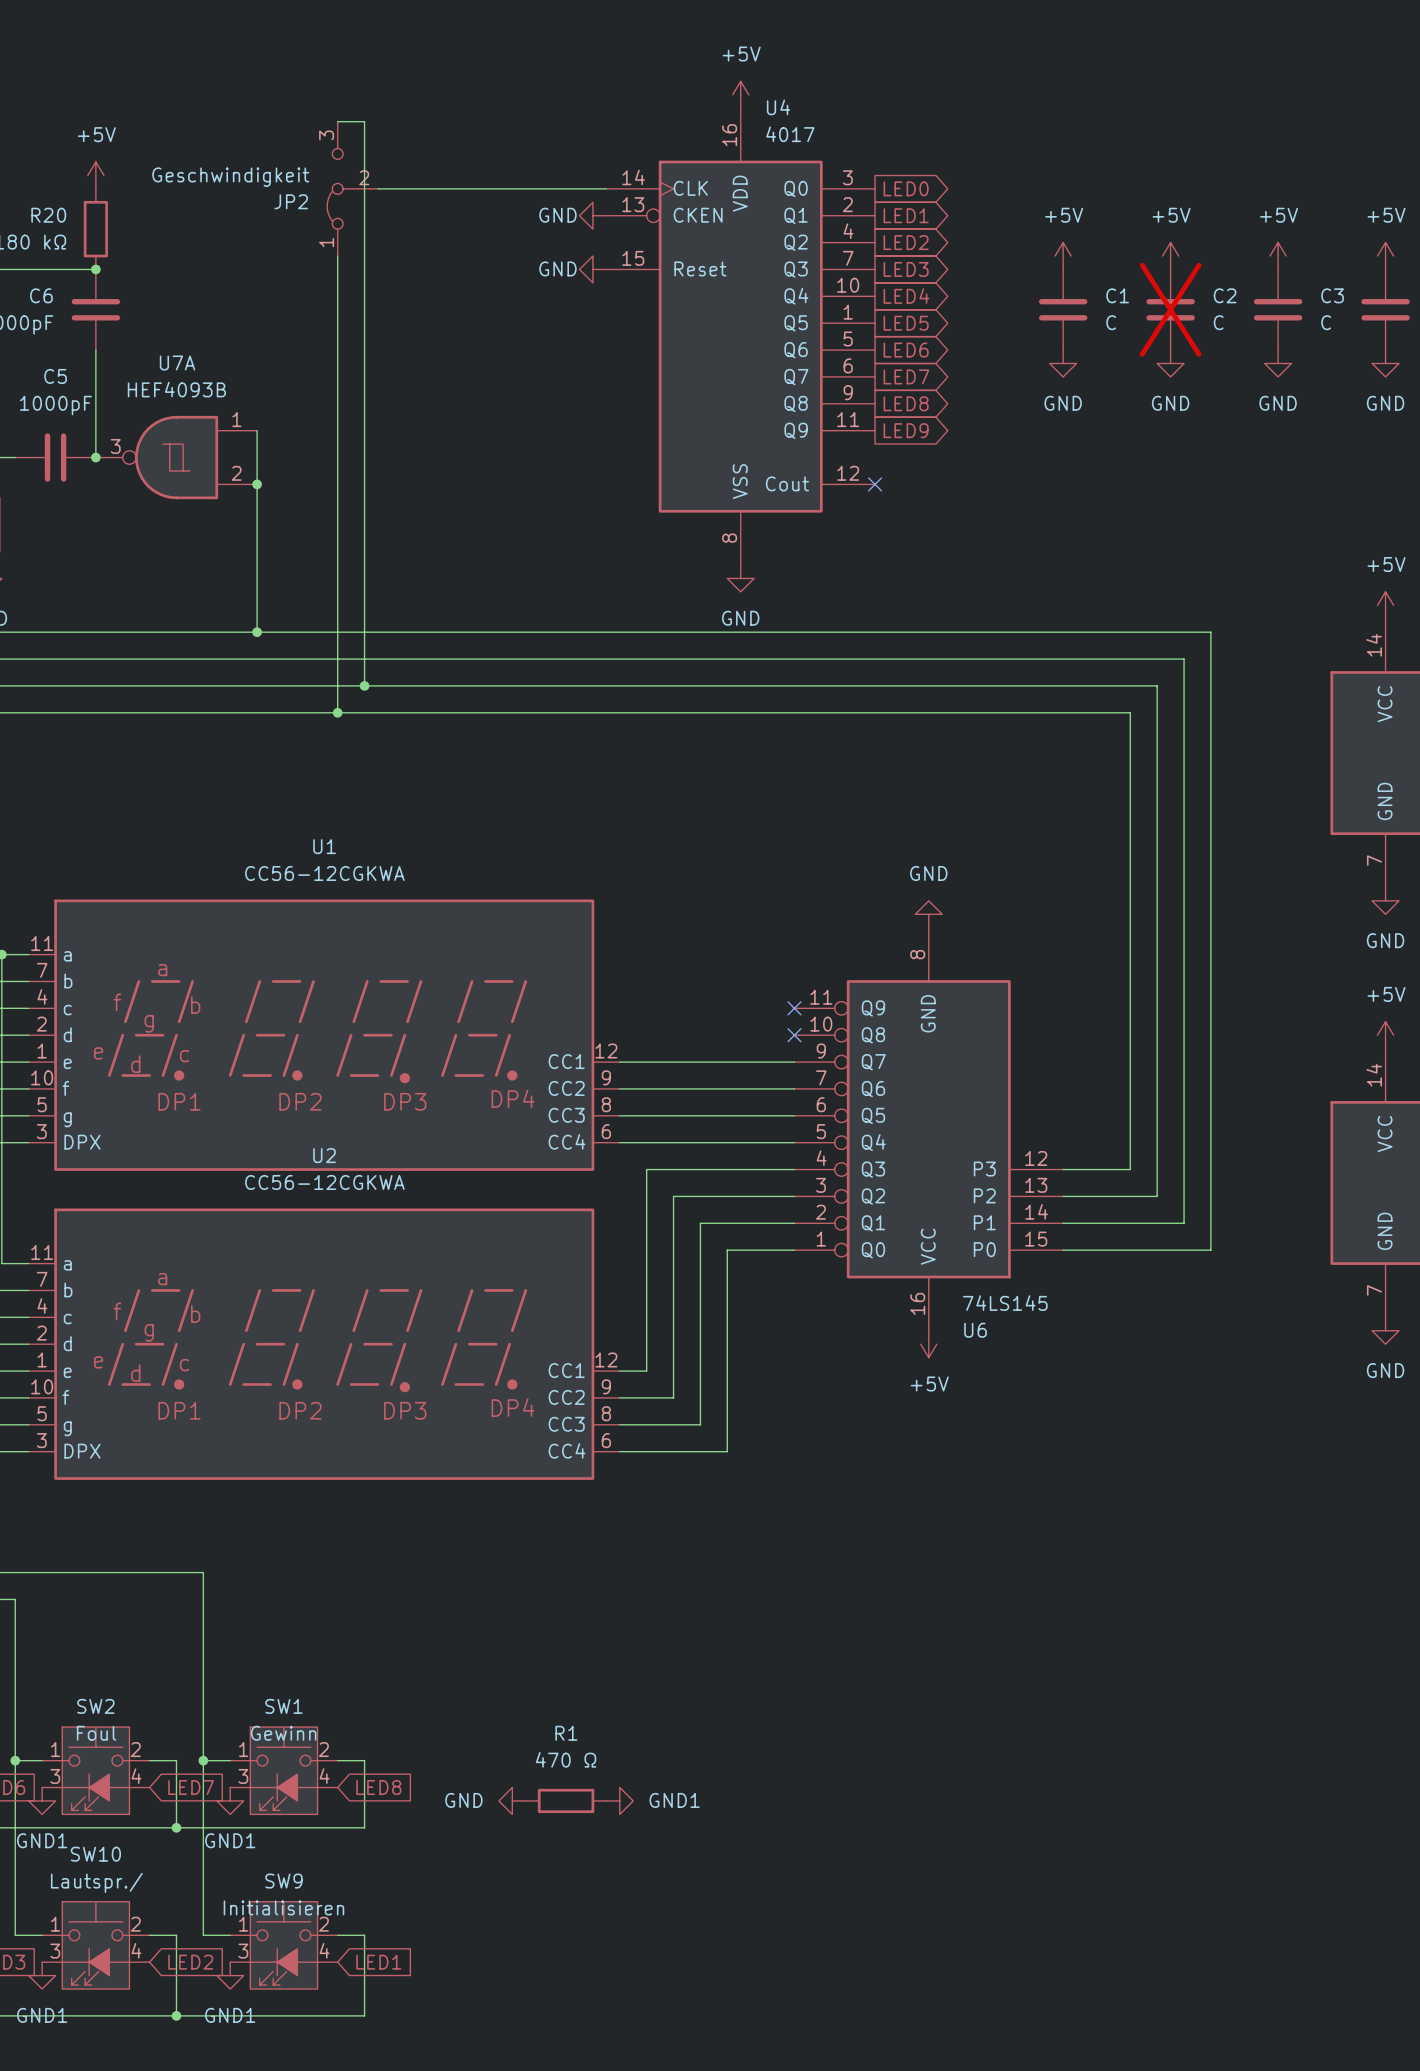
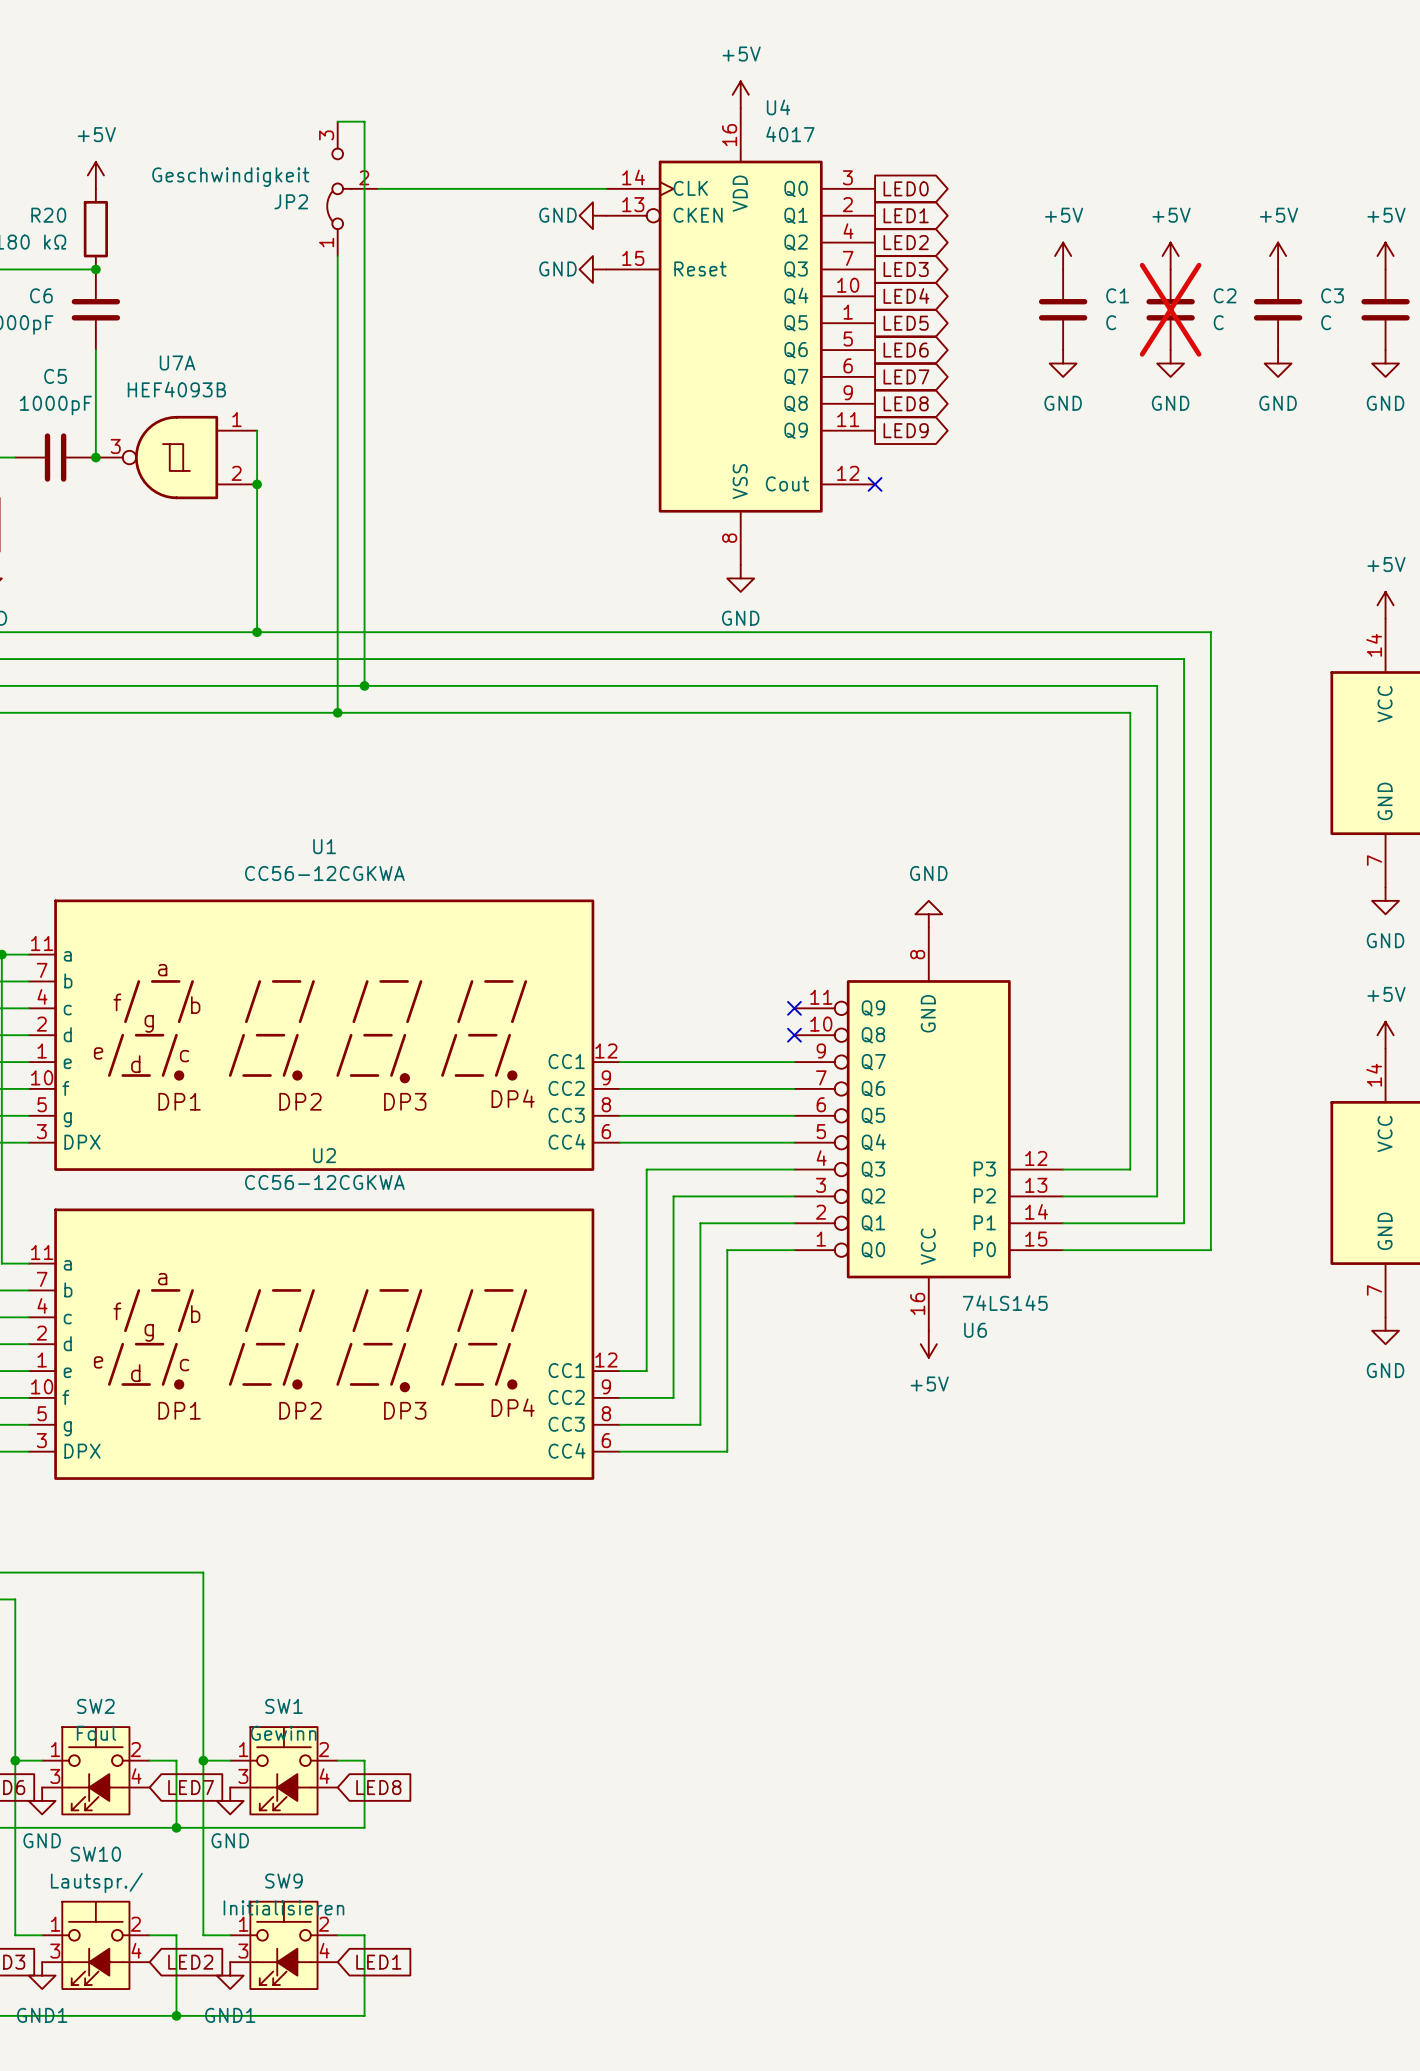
power symbol: GND1 (42, 1800) -> GND (42, 1800)
power symbol: GND1 (230, 1800) -> GND (230, 1800)
power symbol: GND (512, 1800) -> none
R1: 470 Ω (566, 1800) -> none
power symbol: GND1 (619, 1800) -> none

